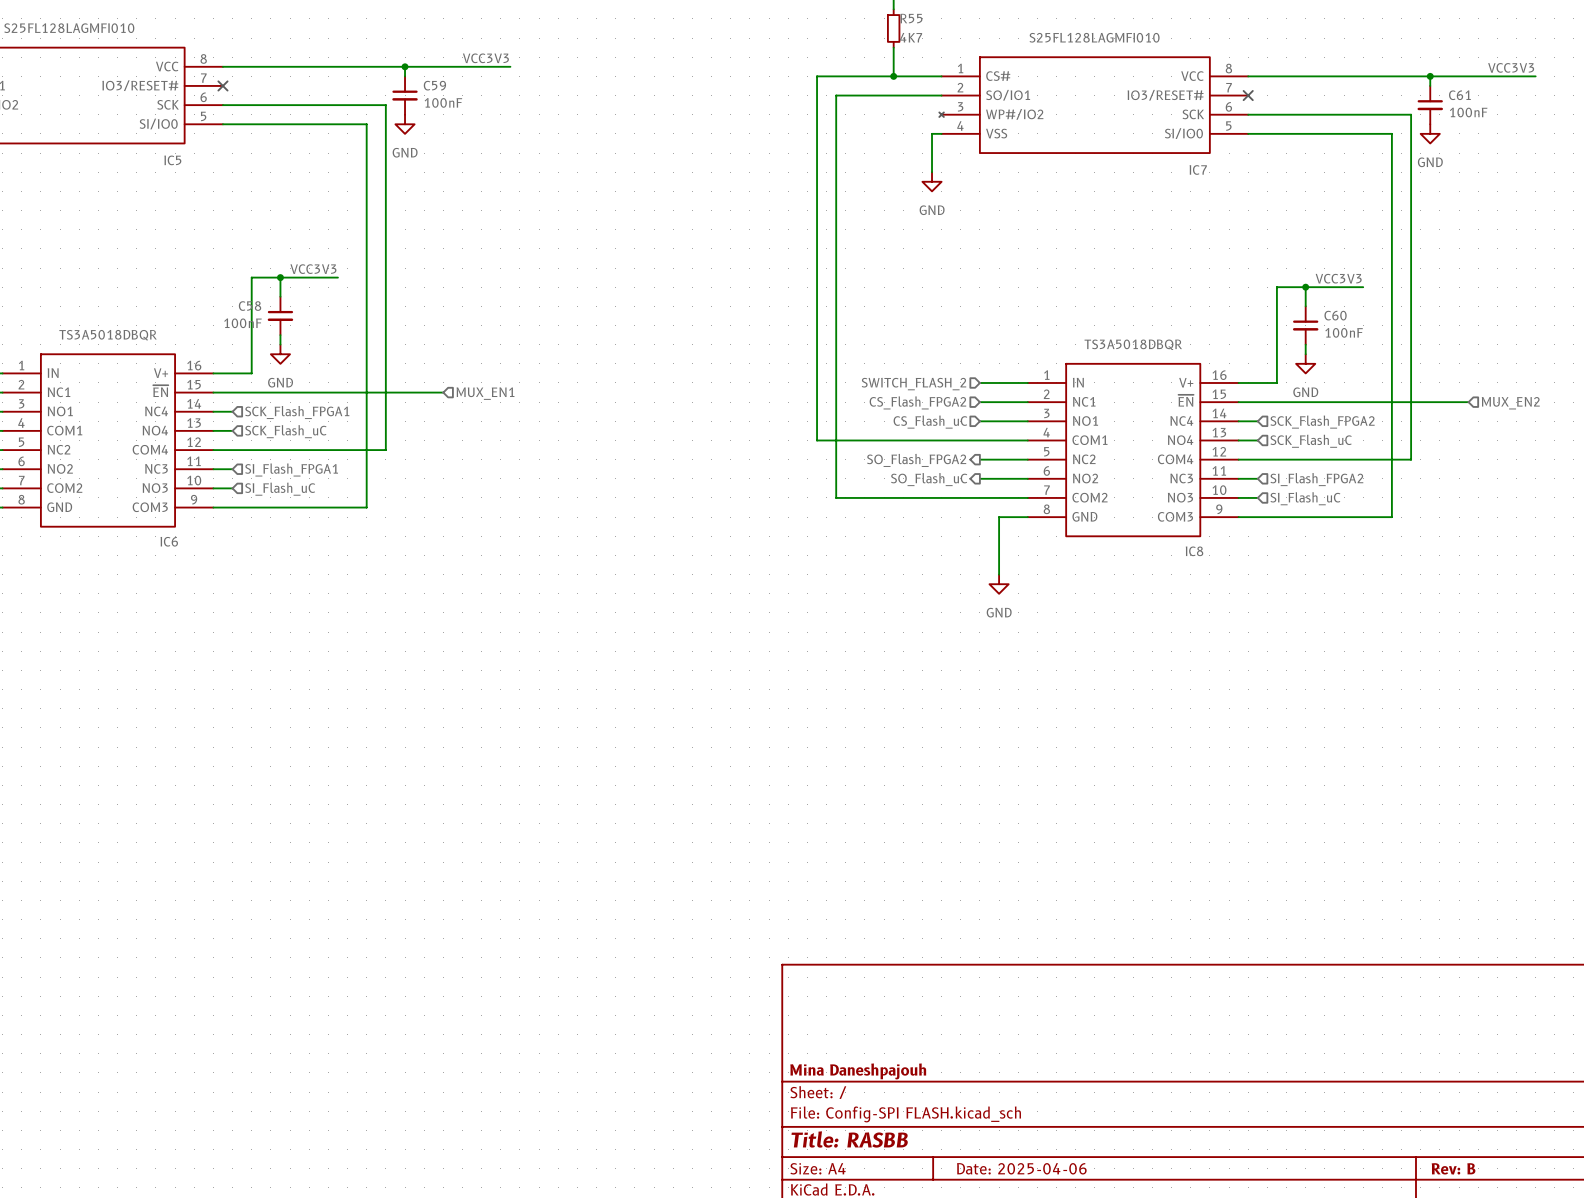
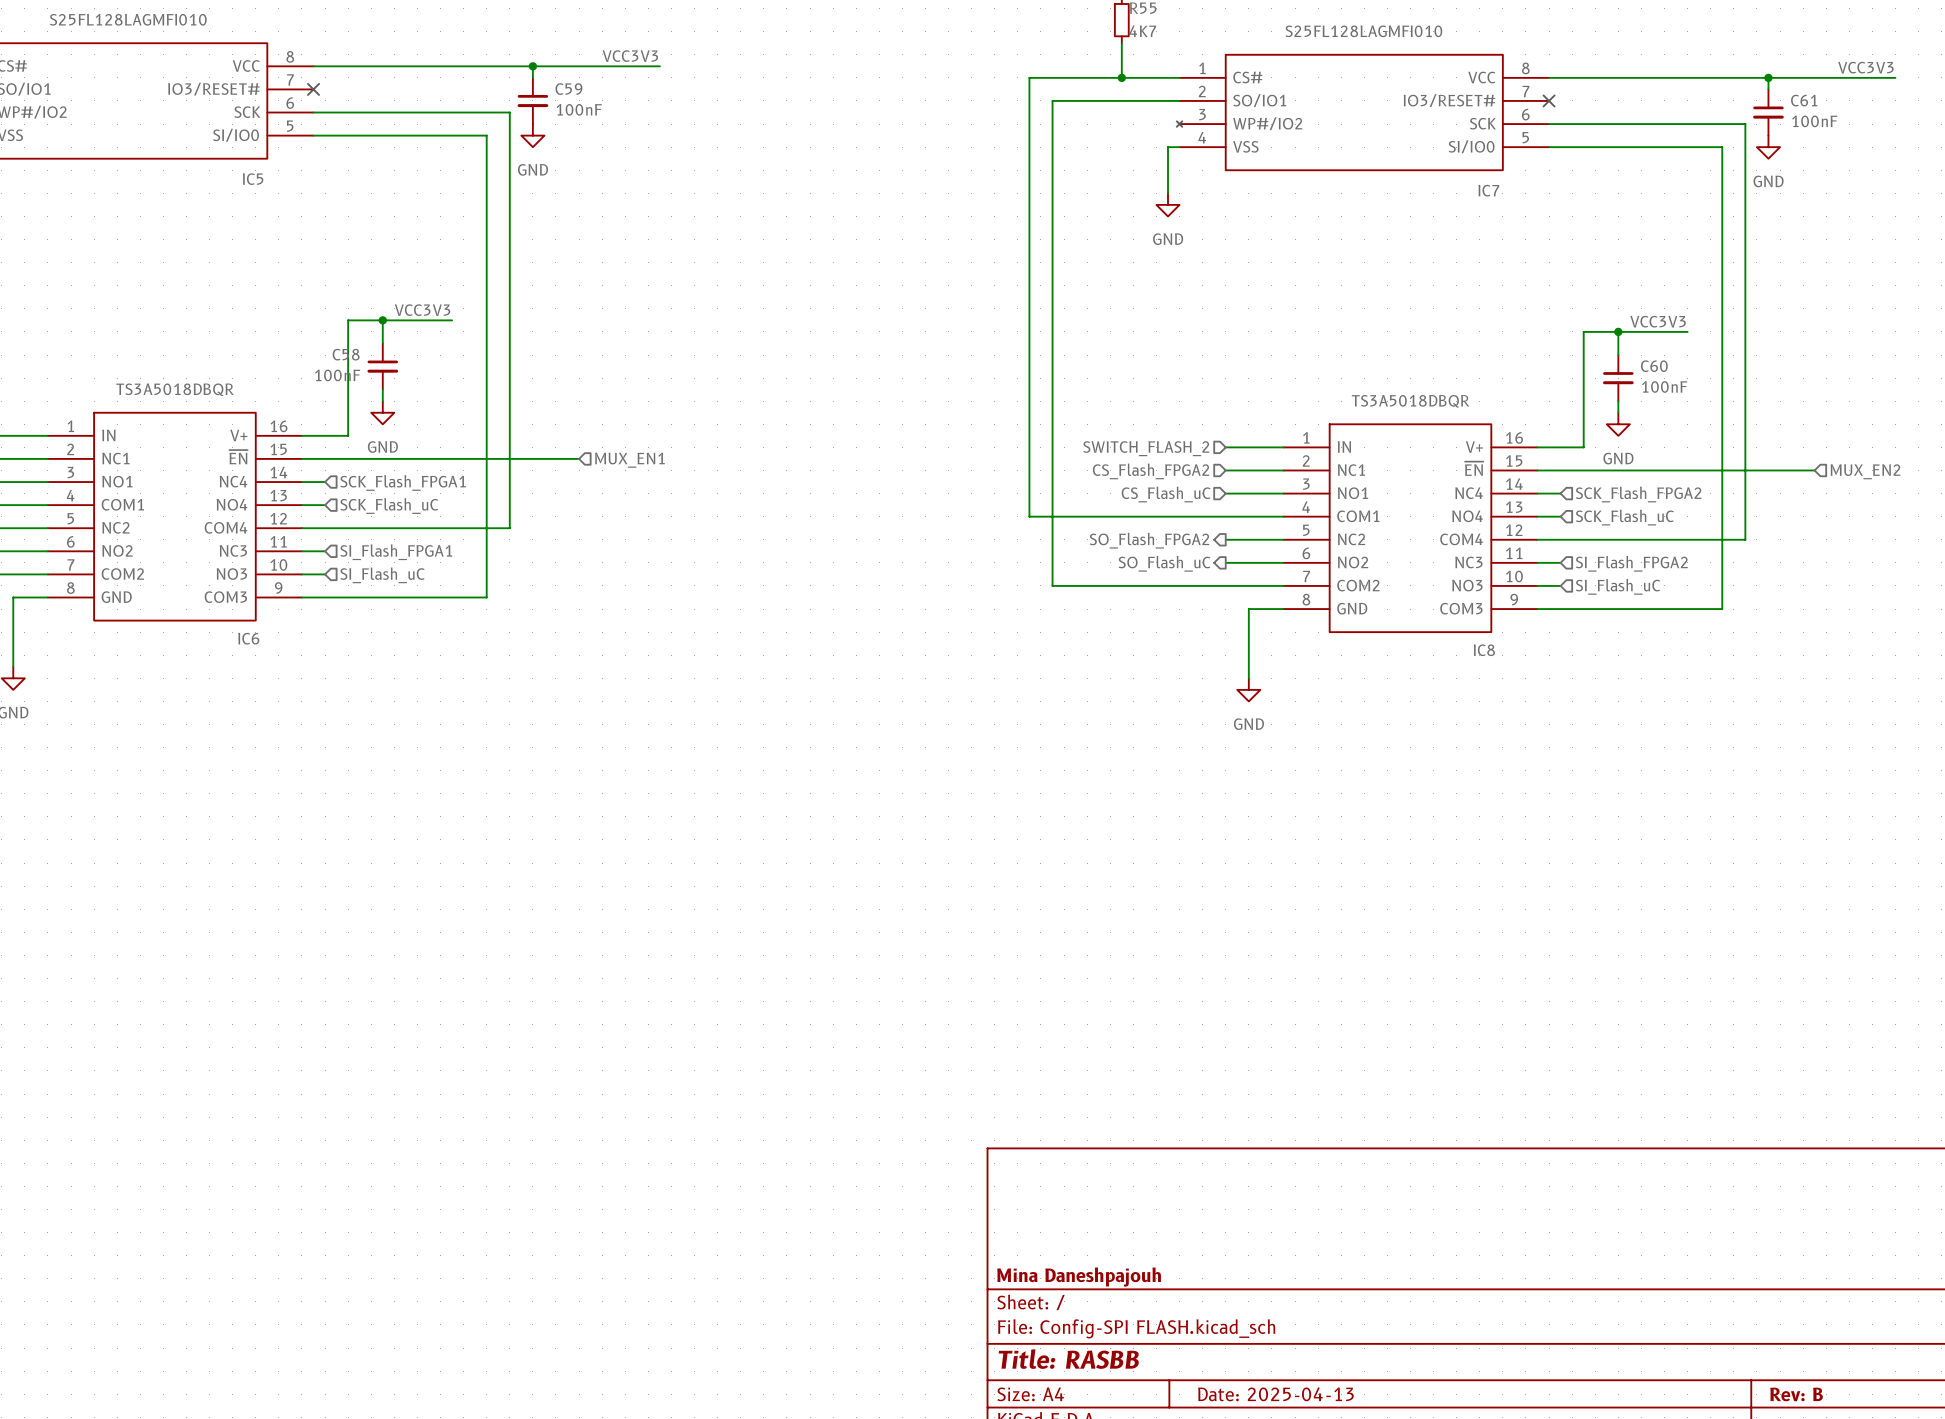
title block: Date: 2025-04-06 (1021, 1168) -> Date: 2025-04-13 (1275, 1394)

